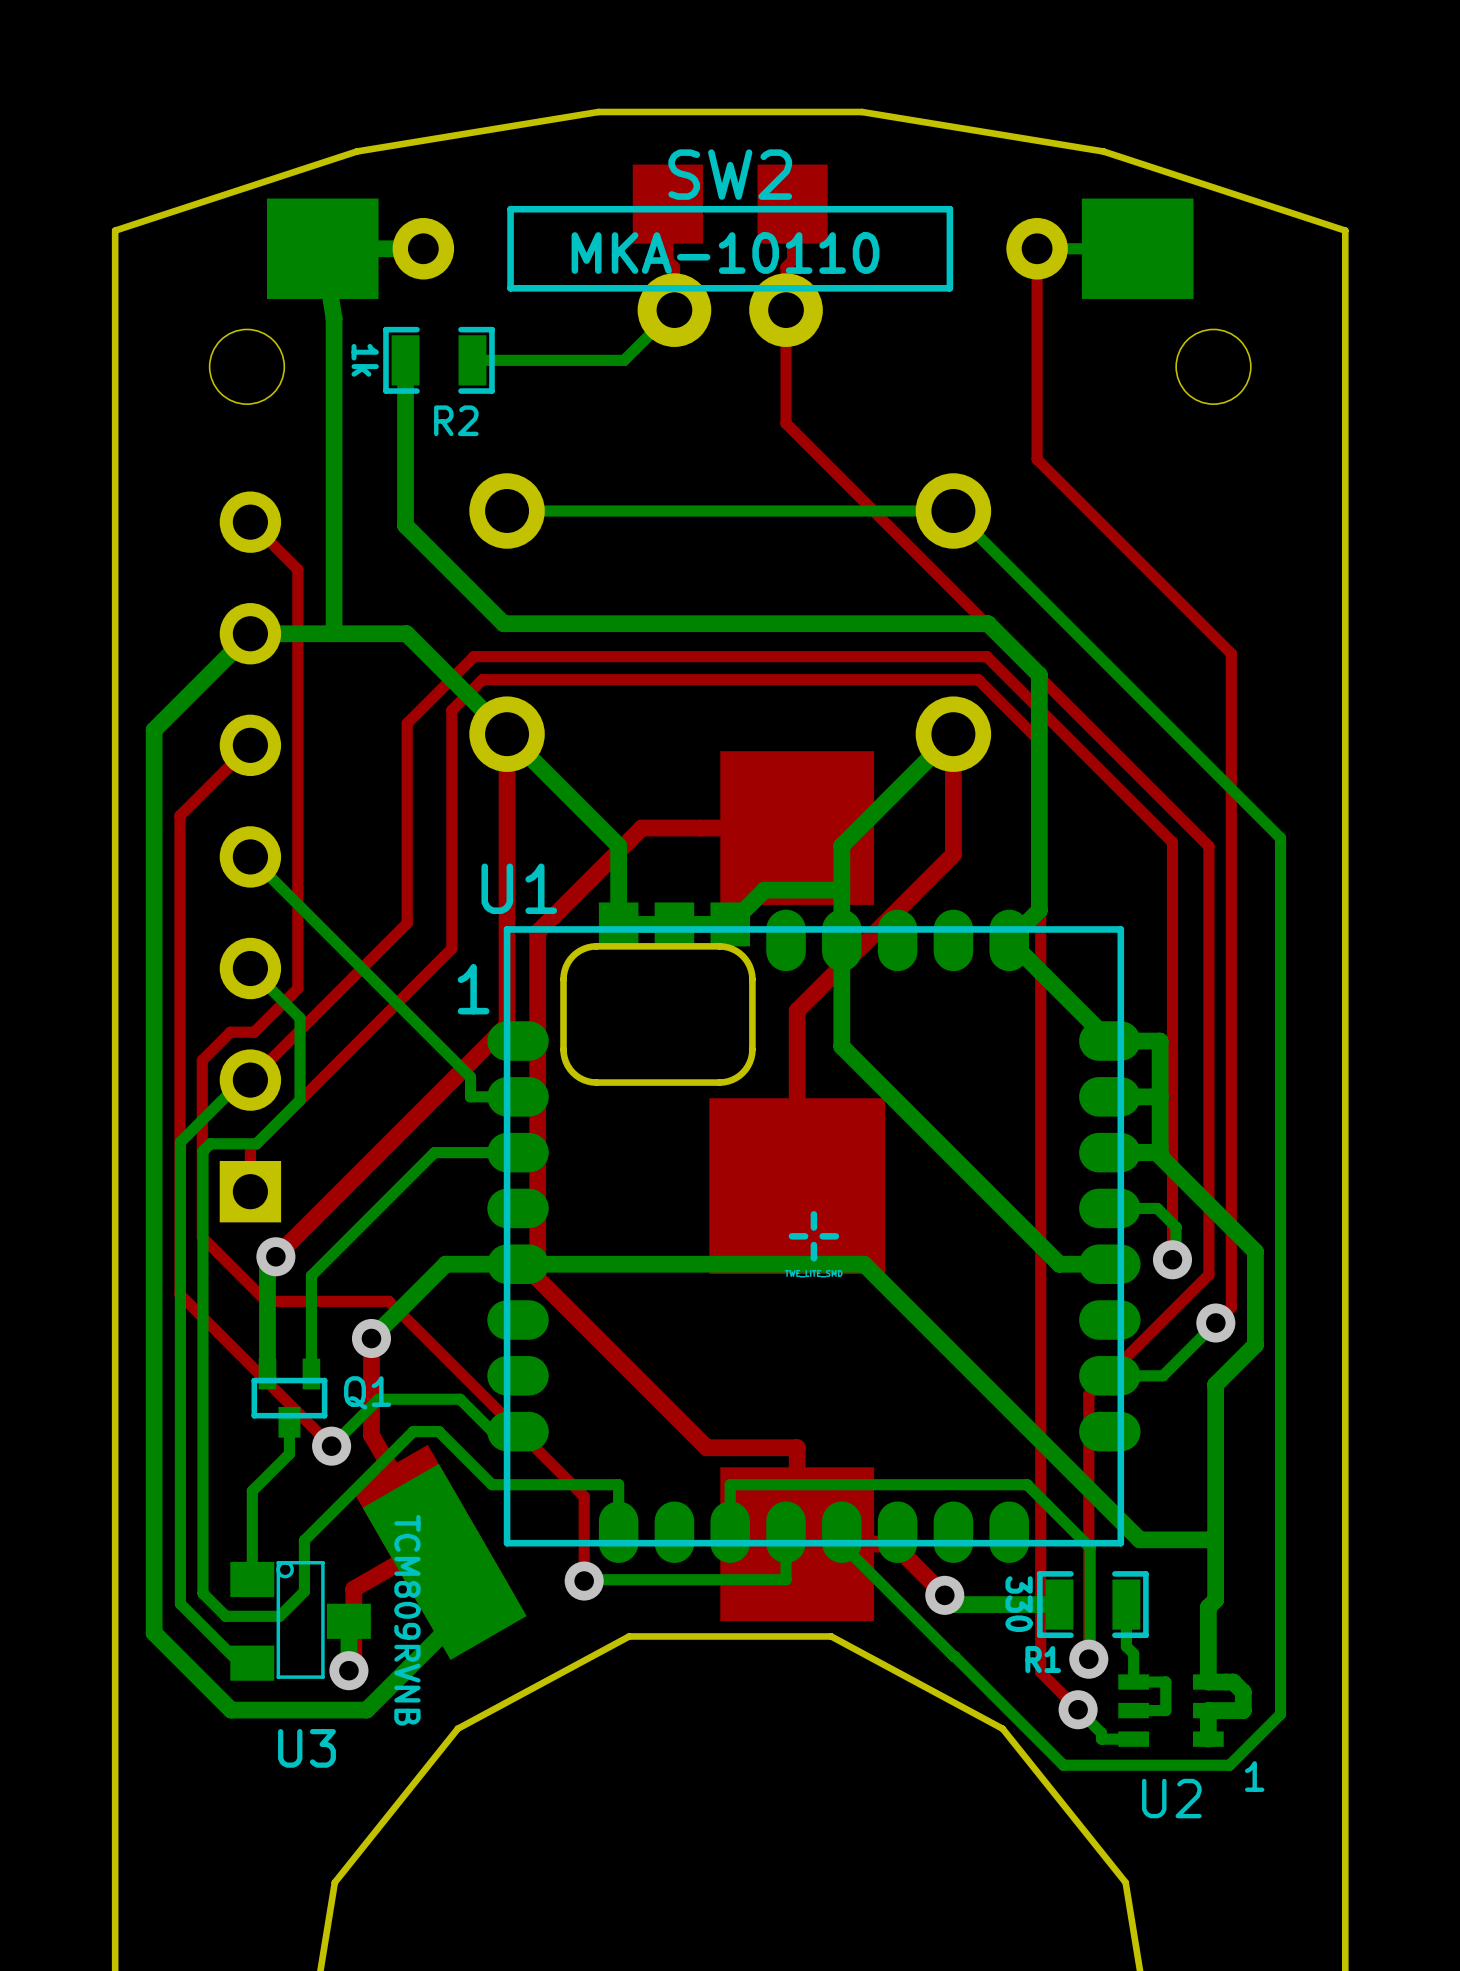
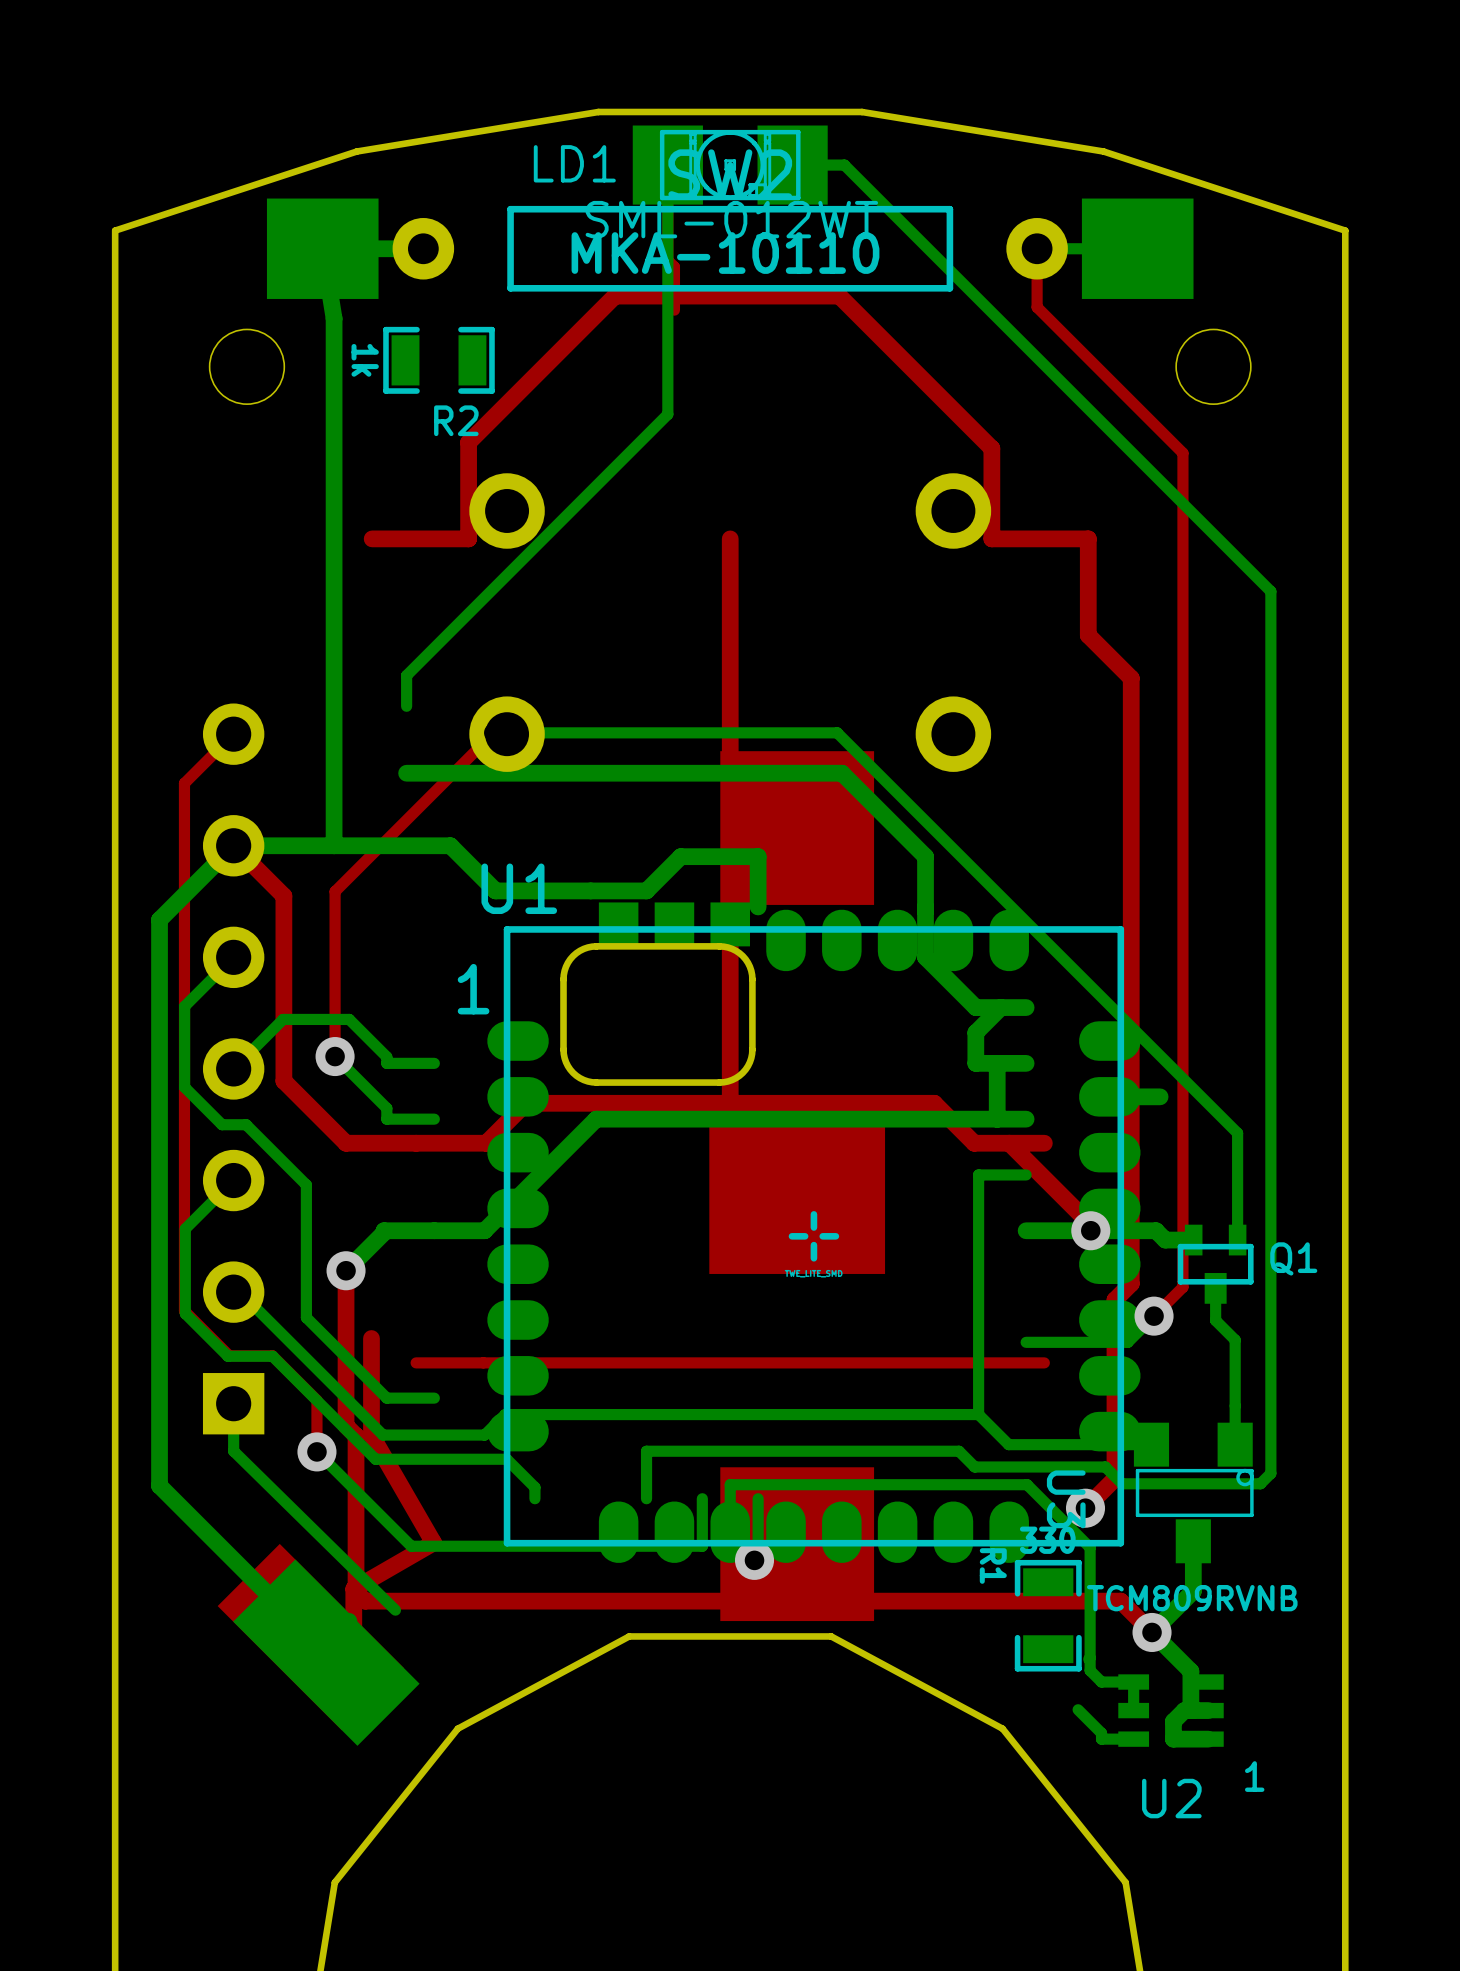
bottom track: none -> (667, 165) (667, 414) (406, 675) (406, 706)
bottom track: none -> (792, 165) (844, 165) (1270, 591) (1270, 1473) (1260, 1483) (1122, 1483) (1105, 1467) (974, 1467) (959, 1451) (646, 1451) (646, 1498)
LD1 side: top (730, 204) -> bottom (730, 165)
top track: (792, 204) (792, 260) (786, 267) (786, 423) (1208, 846) (1208, 1274) (1088, 1394) (1088, 1659) -> none
top track: (1037, 307) (1037, 459) (1231, 653) (1231, 1307) (1215, 1323) -> (1037, 307) (1182, 453) (1182, 1287) (1154, 1316)
bottom track: (674, 310) (624, 360) (472, 360) -> none
part: (730, 310) -> none
bottom track: (405, 360) (405, 525) (503, 623) (988, 623) (1039, 675) (1039, 910) (1009, 940) (1109, 1041) (1159, 1041) -> none
bottom track: (507, 510) (953, 510) (1280, 838) (1280, 1714) (1229, 1765) (1063, 1765) (954, 1656) -> none
top track: (250, 522) (297, 569) (297, 988) (254, 1032) (230, 1032) (202, 1060) (202, 1237) (266, 1301) (389, 1301) (584, 1496) (584, 1581) -> none
top track: none -> (372, 538) (468, 538) (468, 442) (614, 296) (839, 296) (991, 448) (991, 538) (1088, 538) (1088, 635) (1131, 678) (1131, 1283) (1114, 1299) (1114, 1478) (1085, 1508)
top track: none -> (730, 538) (730, 1103)
bottom track: none -> (334, 633) (334, 845)
top track: none -> (493, 732) (335, 891) (335, 1056)
bottom track: none -> (493, 732) (837, 732) (1237, 1133) (1237, 1240)
top track: none -> (233, 734) (184, 783) (184, 1310) (229, 1355) (272, 1355) (316, 1400) (316, 1451)
top track: (507, 734) (507, 1025) (275, 1256) -> none
top track: (953, 734) (953, 854) (797, 1010) (797, 1186) -> none
bottom track: (953, 734) (841, 845) (841, 1046) (1059, 1264) (1109, 1264) -> none
top track: (250, 745) (179, 815) (179, 1294) (331, 1446) -> none
bottom track: none -> (406, 773) (842, 773) (925, 856) (925, 957) (975, 1007) (1026, 1007)
top track: (797, 828) (641, 828) (537, 932) (537, 1278) (706, 1447) (797, 1447) (797, 1544) (893, 1544) (944, 1595) -> none
top track: none -> (233, 845) (283, 895) (283, 1081) (346, 1143) (486, 1143) (526, 1103) (934, 1103) (974, 1143) (1044, 1143)
bottom track: (250, 856) (470, 1077) (470, 1096) (518, 1096) -> none
part position: (250, 856) -> (233, 1068)
bottom track: (841, 890) (764, 890) (730, 924) (618, 924) (618, 845) (406, 633) (250, 633) (154, 729) (154, 1633) (231, 1710) (366, 1710) (444, 1632) (444, 1561) -> none
bottom track: none -> (758, 906) (758, 856) (680, 856) (646, 890) (495, 890) (450, 845) (233, 845) (159, 919) (159, 1485) (326, 1652)
bottom track: none -> (233, 957) (184, 1006) (184, 1087) (222, 1124) (246, 1124) (306, 1184) (306, 1317) (386, 1398) (434, 1398)
bottom track: (250, 968) (300, 1018) (300, 1100) (256, 1143) (210, 1143) (202, 1151) (202, 1593) (225, 1616) (279, 1616) (304, 1591) (304, 1540) (413, 1431) (438, 1431) (492, 1484) (618, 1484) (618, 1532) -> none
bottom track: none -> (1000, 1007) (975, 1032) (975, 1063) (1026, 1063)
bottom track: (1160, 1041) (1160, 1152) (1109, 1152) -> none
bottom track: none -> (335, 1056) (386, 1108) (386, 1119) (434, 1119)
via: none -> (335, 1056)
bottom track: none -> (434, 1063) (386, 1063) (386, 1056) (349, 1019) (283, 1019) (233, 1068)
bottom track: none -> (1000, 1063) (997, 1067) (997, 1119)
top track: (250, 1080) (407, 923) (407, 723) (473, 656) (986, 656) (1172, 842) (1172, 1259) -> none
bottom track: (250, 1080) (242, 1080) (180, 1142) (180, 1603) (239, 1663) (252, 1663) -> none
bottom track: none -> (1026, 1119) (596, 1119) (484, 1230) (384, 1230) (346, 1270)
top track: none -> (1009, 1143) (1090, 1224) (1090, 1230)
bottom track: (518, 1152) (434, 1152) (311, 1275) (311, 1373) -> none
bottom track: (1156, 1152) (1255, 1251) (1255, 1344) (1215, 1384) (1215, 1600) (1208, 1607) (1208, 1682) (1233, 1682) (1243, 1692) (1243, 1710) (1208, 1710) (1208, 1739) -> (1208, 1710) (1184, 1710) (1173, 1721) (1173, 1739) (1208, 1739)
bottom track: none -> (1026, 1174) (978, 1174) (978, 1414)
bottom track: none -> (233, 1180) (185, 1228) (185, 1313) (227, 1356) (272, 1356) (375, 1459) (506, 1459) (534, 1487) (534, 1498)
top track: (250, 1191) (250, 1144) (256, 1144) (451, 948) (451, 710) (482, 679) (978, 679) (1040, 742) (1040, 1672) (1078, 1709) -> none
bottom track: (1109, 1208) (1157, 1208) (1176, 1227) (1176, 1256) (1172, 1259) -> none
bottom track: none -> (1026, 1230) (1156, 1230) (1165, 1240) (1193, 1240)
via: none -> (1090, 1230)
bottom track: (275, 1256) (267, 1265) (267, 1373) -> none
via: (275, 1256) -> none
via: (1172, 1259) -> none
top track: none -> (346, 1270) (346, 1425) (356, 1435) (356, 1591) (365, 1601) (1120, 1601) (1152, 1632)
via: none -> (346, 1270)
bottom track: none -> (1215, 1288) (1215, 1320) (1235, 1340) (1235, 1444)
bottom track: none -> (233, 1292) (240, 1292) (382, 1435) (484, 1435) (505, 1414) (978, 1414)
bottom track: none -> (1154, 1316) (1127, 1342) (1026, 1342)
via: none -> (1154, 1316)
bottom track: (1215, 1323) (1163, 1375) (1109, 1375) -> none
via: (1215, 1323) -> none
bottom track: (371, 1338) (445, 1264) (864, 1264) (1139, 1539) (1215, 1539) -> none
via: (371, 1338) -> none
top track: none -> (1044, 1362) (416, 1362)
Q1 position: (289, 1398) -> (1215, 1264)
bottom track: none -> (233, 1403) (233, 1451) (395, 1610)
bottom track: none -> (978, 1414) (1008, 1444) (1151, 1444)
bottom track: (289, 1422) (289, 1453) (252, 1491) (252, 1579) -> none
bottom track: (518, 1431) (492, 1431) (460, 1399) (378, 1399) (331, 1446) -> none
via position: (331, 1446) -> (316, 1451)
bottom track: none -> (316, 1451) (411, 1546) (702, 1546) (702, 1498)
bottom track: none -> (758, 1498) (758, 1556) (754, 1560)
via: none -> (1085, 1508)
bottom track: (786, 1532) (786, 1579) (584, 1581) -> none
bottom track: (841, 1532) (841, 1544) (953, 1656) -> none
bottom track: none -> (1193, 1541) (1193, 1591) (1152, 1632) (1190, 1671) (1190, 1710)
part: (439, 1552) -> none
via: none -> (754, 1560)
via: (584, 1581) -> none
bottom track: (944, 1595) (954, 1604) (1059, 1604) -> none
via: (944, 1595) -> none
R1 rotation: 0° (1092, 1604) -> 90° clockwise (1048, 1615)
bottom track: (1126, 1604) (1126, 1646) (1133, 1653) (1133, 1682) (1165, 1682) (1165, 1710) (1133, 1710) -> (1090, 1657) (1090, 1670) (1101, 1682) (1133, 1682) (1133, 1710)
U3 rotation: 0° (300, 1620) -> 90° clockwise (1193, 1492)
U3 position: (300, 1620) -> (1193, 1492)
via: none -> (1152, 1632)
part: none -> (318, 1644)
via: (1088, 1659) -> none
via: (348, 1670) -> none
via: (1078, 1709) -> none

